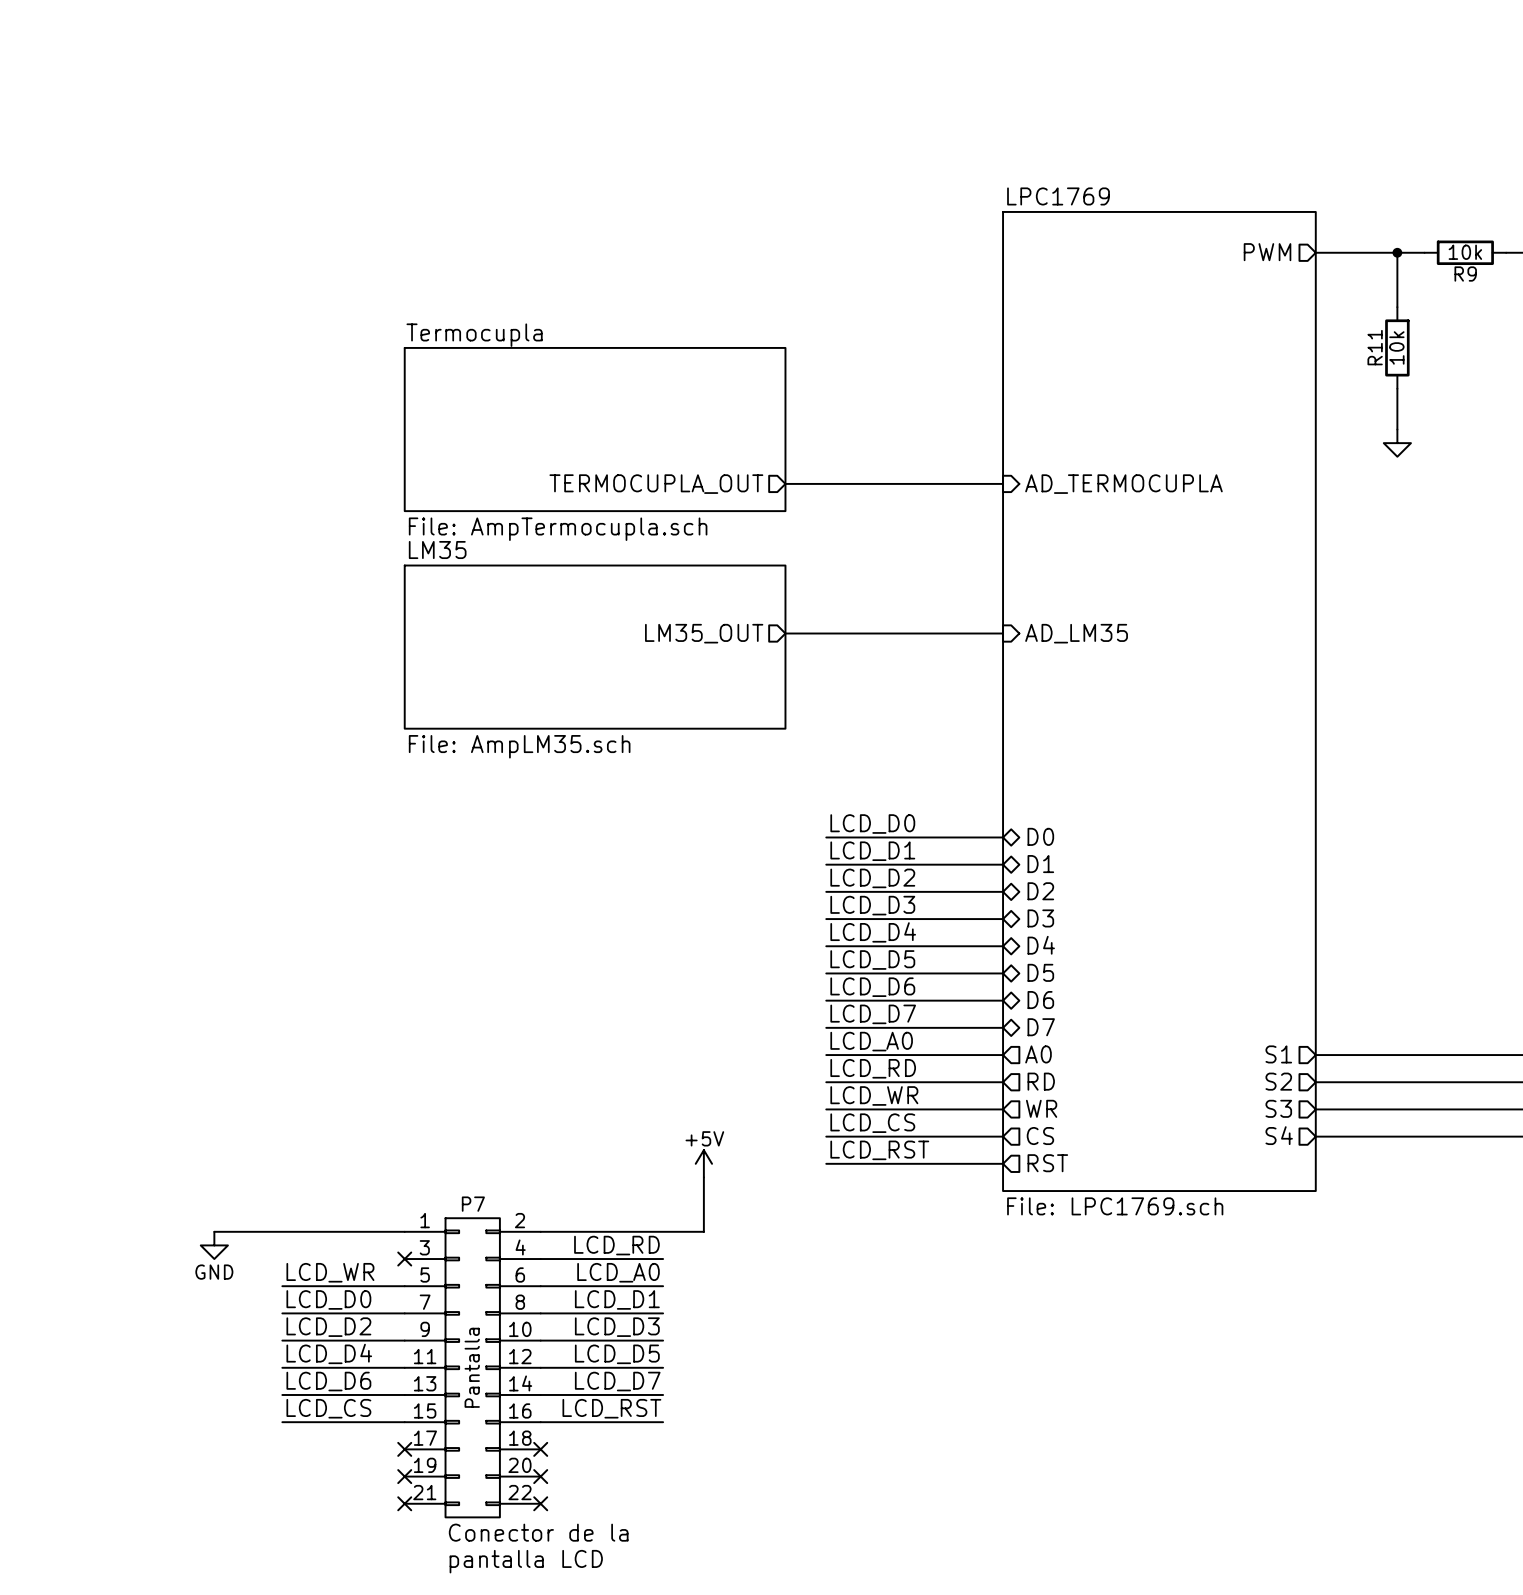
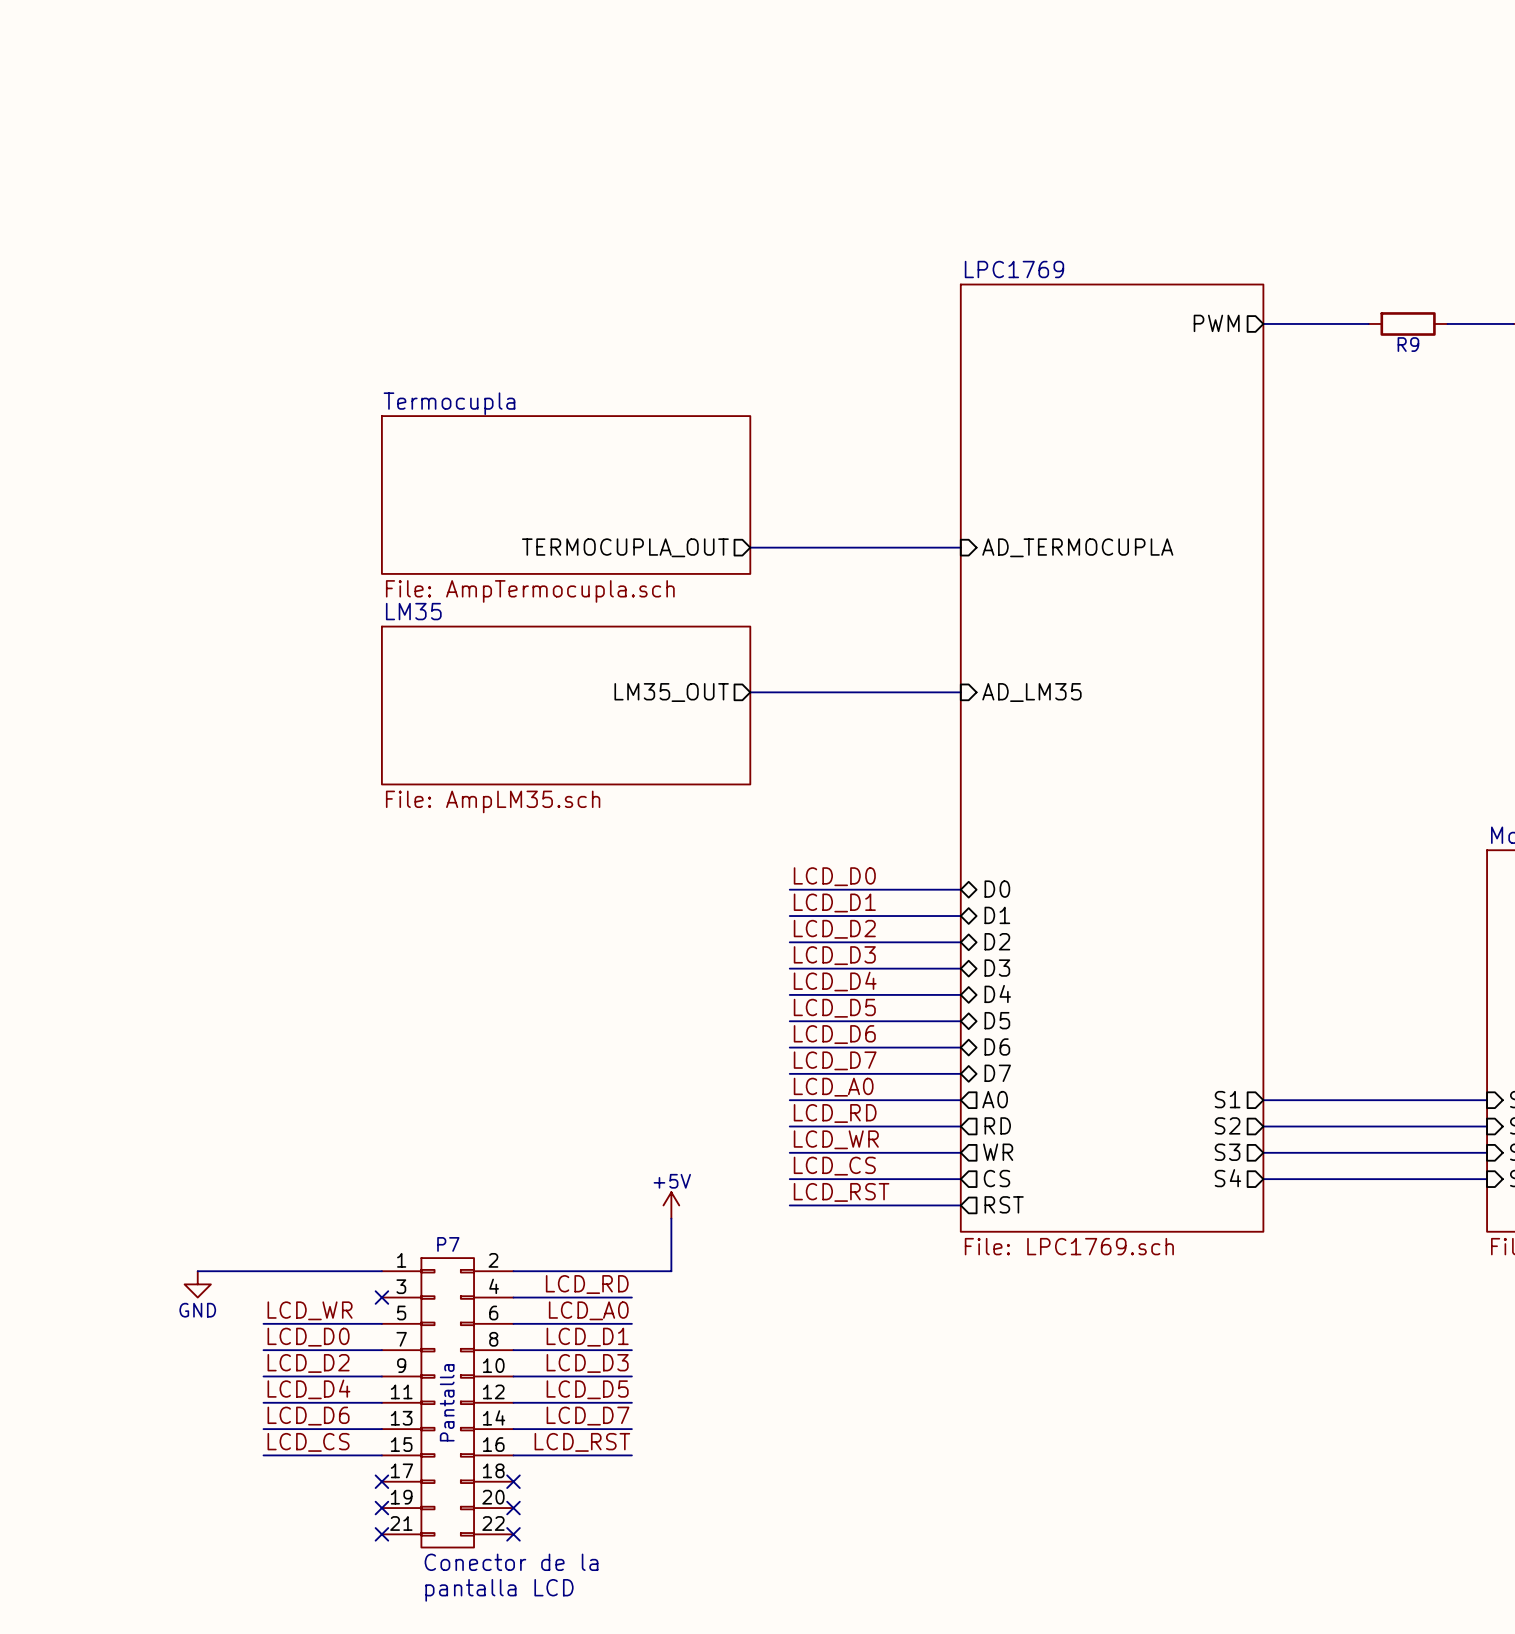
wire: (1397, 252) (1397, 307) -> none
junction: (1397, 252) -> none
R9 value: 10k (1465, 252) -> none
R11: 10k (1397, 347) -> none
wire: (1397, 388) (1397, 429) -> none
power symbol: (1397, 443) -> none

